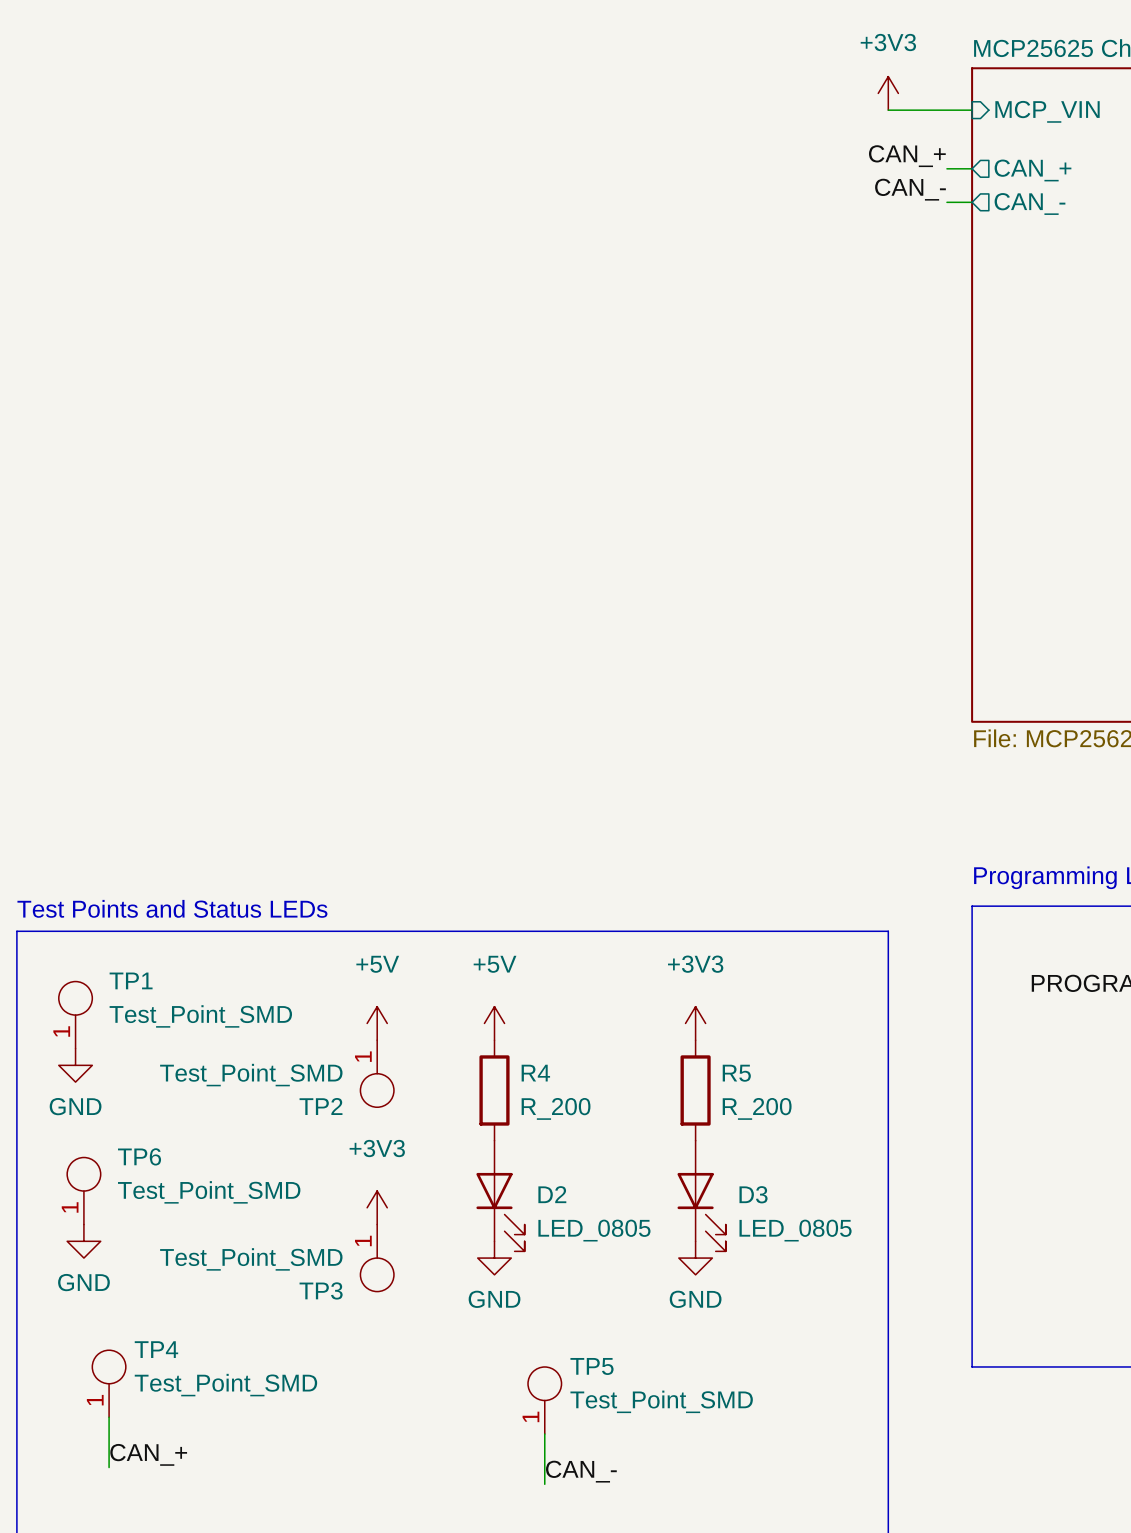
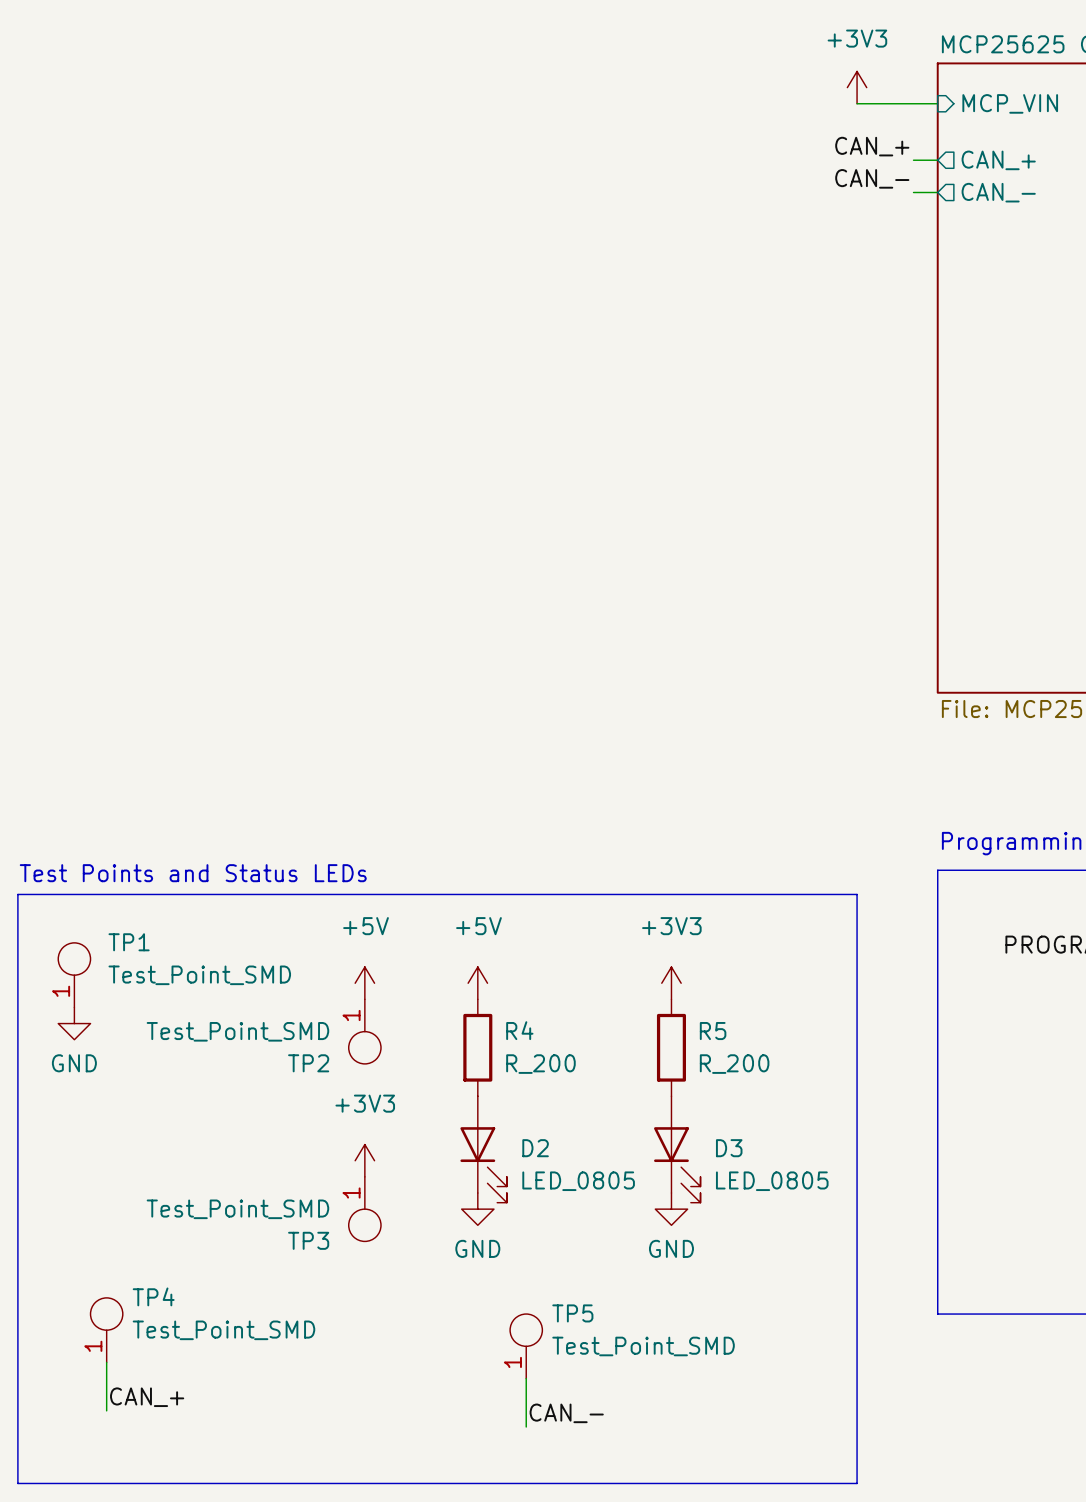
TP6: Test_Point_SMD (83, 1191) -> none
power symbol: GND (83, 1241) -> none

